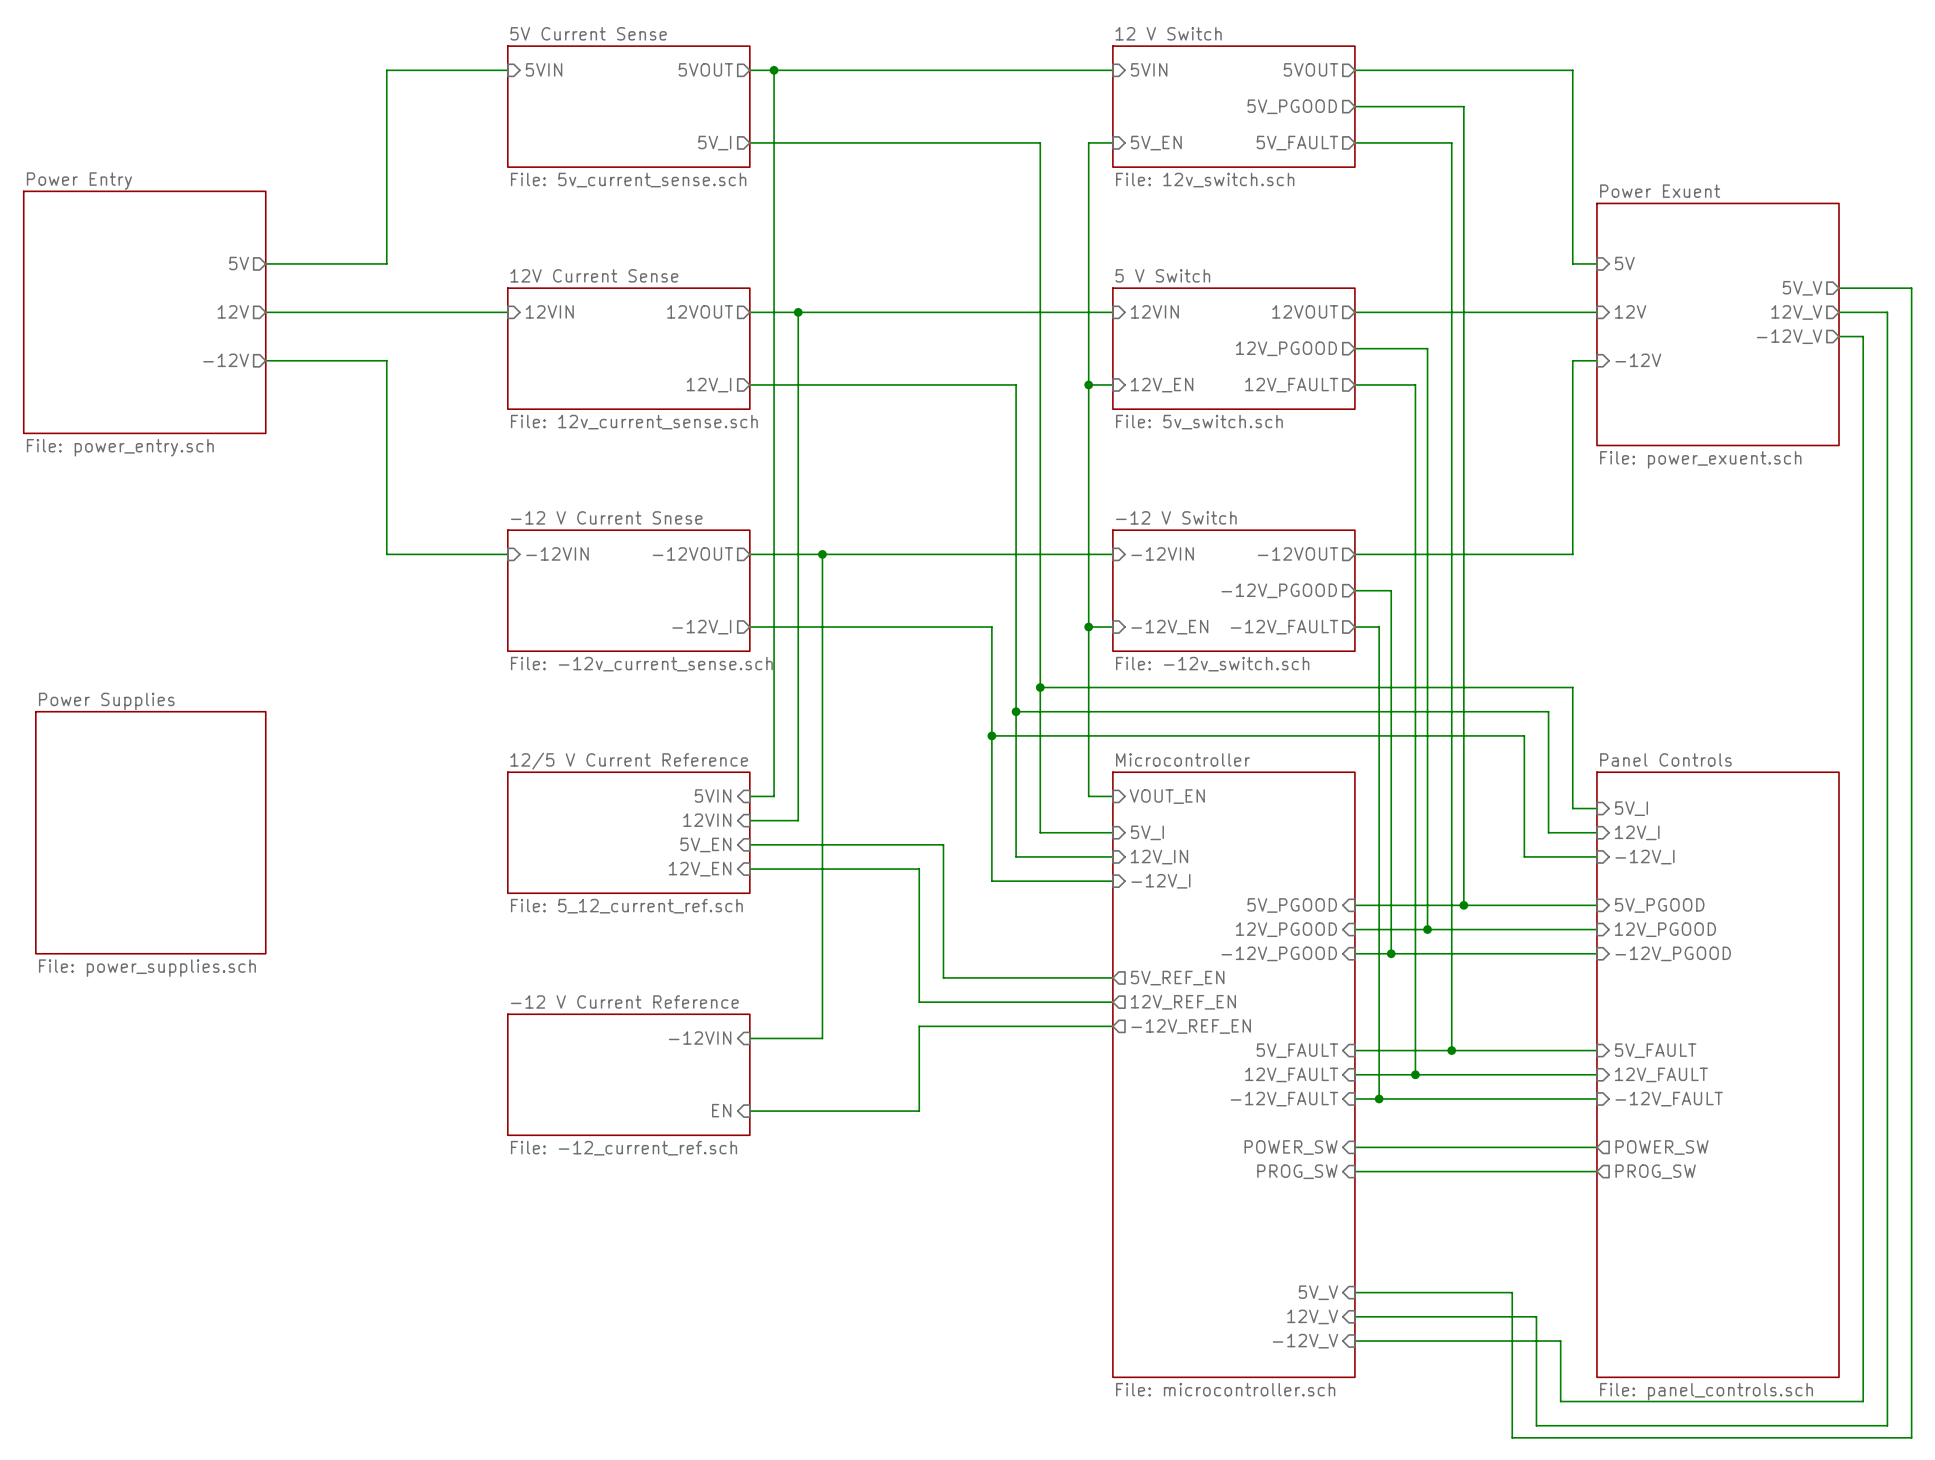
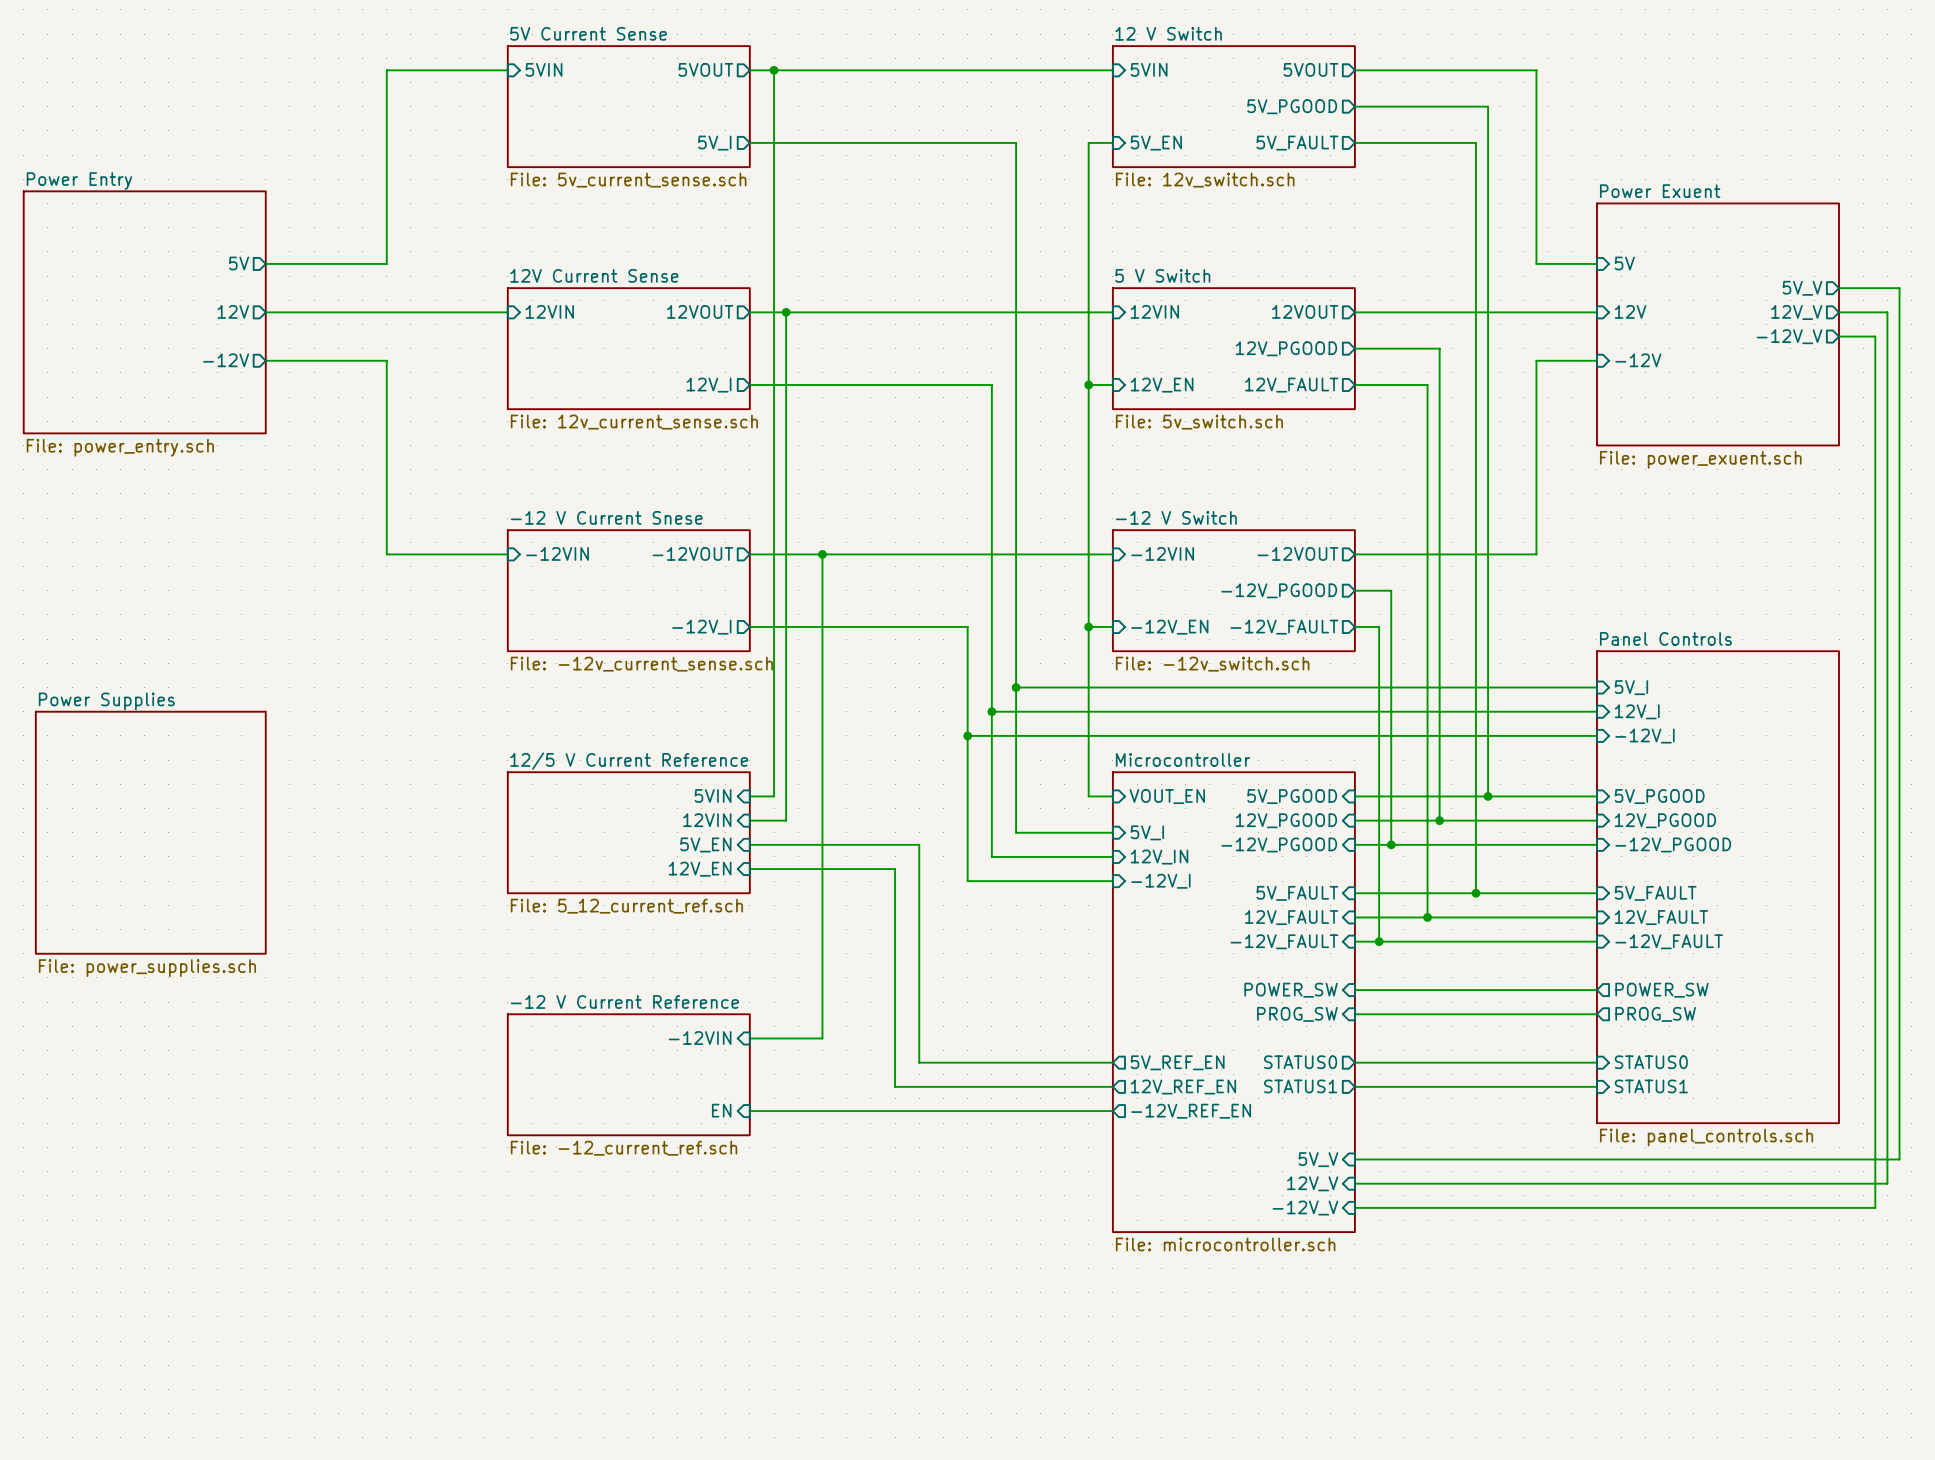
wire: (1536, 70) (1572, 70) (1572, 263) -> (1536, 70) (1536, 263) (1572, 263)
wire: (1463, 106) (1463, 905) -> (1463, 106) (1488, 106) (1488, 796)
wire: (1016, 142) (1040, 142) (1040, 832) -> (1016, 832) (1040, 832)
wire: (1451, 142) (1451, 1050) -> (1451, 142) (1475, 142) (1475, 893)
wire: (1899, 288) (1911, 288) (1911, 1437) (1512, 1437) (1512, 1292) (1354, 1292) -> (1899, 288) (1899, 1159) (1354, 1159)
wire: (798, 312) (798, 820) (786, 820) -> (786, 312) (786, 820)
junction position: (798, 312) -> (786, 312)
wire: (1863, 336) (1863, 1401) (1560, 1401) (1560, 1341) (1354, 1341) -> (1863, 336) (1875, 336) (1875, 1207) (1354, 1207)
wire: (1427, 348) (1427, 384) -> (1415, 384) (1427, 384)
wire: none -> (1427, 348) (1439, 348) (1439, 820)
wire: (1572, 360) (1572, 554) (1536, 554) -> (1572, 360) (1536, 360) (1536, 554)
wire: (991, 384) (1016, 384) -> (1016, 142) (1016, 384)
wire: (1415, 384) (1415, 1074) -> none
wire: (967, 627) (991, 627) -> (991, 384) (991, 627)
wire: none -> (1016, 687) (1040, 687)
junction: none -> (1016, 687)
junction: (1040, 687) -> none
wire: (1572, 687) (1572, 808) (1596, 808) -> (1572, 687) (1596, 687)
wire: none -> (991, 711) (1016, 711)
junction: none -> (991, 711)
junction: (1016, 711) -> none
wire: (1548, 711) (1548, 832) (1596, 832) -> (1548, 711) (1596, 711)
wire: none -> (967, 735) (991, 735)
junction: none -> (967, 735)
junction: (991, 735) -> none
wire: (1524, 735) (1524, 856) (1596, 856) -> (1524, 735) (1596, 735)
junction: none -> (1488, 796)
sheet pin position: 5V_I (1631, 808) -> 5V_I (1631, 687)
junction: none -> (1439, 820)
wire: (1016, 832) (1016, 856) -> (991, 856) (1016, 856)
sheet pin position: 12V_I (1637, 832) -> 12V_I (1637, 711)
wire: (919, 844) (943, 844) (943, 977) (1112, 977) -> none
wire: (1391, 844) (1391, 953) -> none
junction: none -> (1391, 844)
wire: (991, 856) (991, 881) -> (967, 627) (967, 881) (991, 881)
sheet pin position: -12V_I (1644, 857) -> -12V_I (1644, 736)
wire: (895, 869) (919, 869) -> (919, 844) (919, 869)
wire: none -> (895, 869) (895, 1086) (1112, 1086)
sheet Panel Controls: none -> File: panel_controls.sch (1717, 887)
wire: none -> (1354, 893) (1596, 893)
sheet pin position: 5V_PGOOD (1292, 905) -> 5V_PGOOD (1292, 796)
wire: (1354, 905) (1596, 905) -> (1354, 820) (1596, 820)
junction position: (1463, 905) -> (1475, 893)
sheet pin position: 5V_PGOOD (1659, 905) -> 5V_PGOOD (1659, 796)
wire: none -> (1354, 917) (1596, 917)
wire: (1427, 917) (1427, 929) -> none
sheet pin position: 12V_PGOOD (1286, 929) -> 12V_PGOOD (1286, 820)
wire: (1354, 929) (1596, 929) -> (1354, 844) (1596, 844)
junction position: (1427, 929) -> (1427, 917)
sheet pin position: 12V_PGOOD (1665, 929) -> 12V_PGOOD (1665, 820)
wire: (1379, 941) (1379, 1098) -> none
sheet pin position: -12V_PGOOD (1279, 953) -> -12V_PGOOD (1279, 844)
wire: (1354, 953) (1596, 953) -> (1354, 796) (1596, 796)
junction position: (1391, 953) -> (1379, 941)
sheet pin position: -12V_PGOOD (1673, 953) -> -12V_PGOOD (1673, 844)
sheet pin position: 5V_REF_EN (1177, 978) -> 5V_REF_EN (1177, 1062)
wire: (919, 1002) (1112, 1002) -> (919, 1002) (919, 1026)
sheet pin position: 12V_REF_EN (1183, 1002) -> 12V_REF_EN (1183, 1087)
sheet Microcontroller: none -> File: microcontroller.sch (1233, 1002)
wire: (919, 1026) (1112, 1026) -> (919, 1111) (1112, 1111)
sheet pin position: -12V_REF_EN (1191, 1026) -> -12V_REF_EN (1191, 1111)
sheet pin position: 5V_FAULT (1297, 1050) -> 5V_FAULT (1297, 893)
wire: (1354, 1050) (1596, 1050) -> (1354, 941) (1596, 941)
junction: (1451, 1050) -> none
sheet pin position: 5V_FAULT (1655, 1050) -> 5V_FAULT (1655, 893)
wire: (919, 1062) (919, 1111) -> (919, 1062) (1112, 1062)
sheet pin: none -> STATUS0 (1300, 1062)
sheet pin: none -> STATUS0 (1651, 1062)
sheet Microcontroller: File: microcontroller.sch (1233, 1074) -> none
sheet pin position: 12V_FAULT (1291, 1074) -> 12V_FAULT (1291, 917)
wire: (1354, 1074) (1596, 1074) -> (1354, 990) (1596, 990)
junction: (1415, 1074) -> none
sheet pin position: 12V_FAULT (1661, 1074) -> 12V_FAULT (1661, 917)
sheet Panel Controls: File: panel_controls.sch (1717, 1074) -> none
sheet pin: none -> STATUS1 (1300, 1086)
sheet pin: none -> STATUS1 (1651, 1086)
wire: (1354, 1098) (1596, 1098) -> (1354, 1014) (1596, 1014)
junction: (1379, 1098) -> none
sheet pin position: -12V_FAULT (1284, 1099) -> -12V_FAULT (1284, 941)
sheet pin position: -12V_FAULT (1669, 1099) -> -12V_FAULT (1669, 941)
sheet pin position: POWER_SW (1291, 1147) -> POWER_SW (1291, 990)
wire: (1354, 1147) (1596, 1147) -> (1354, 1062) (1596, 1062)
sheet pin position: POWER_SW (1661, 1147) -> POWER_SW (1661, 990)
sheet pin position: PROG_SW (1297, 1171) -> PROG_SW (1297, 1014)
wire: (1354, 1171) (1596, 1171) -> (1354, 1086) (1596, 1086)
sheet pin position: PROG_SW (1655, 1171) -> PROG_SW (1655, 1014)
wire: (1887, 1183) (1887, 1425) (1536, 1425) (1536, 1316) (1354, 1316) -> (1887, 1183) (1354, 1183)
sheet pin position: 5V_V (1318, 1292) -> 5V_V (1318, 1159)
sheet pin position: 12V_V (1312, 1316) -> 12V_V (1312, 1183)
sheet pin position: -12V_V (1305, 1341) -> -12V_V (1305, 1208)

